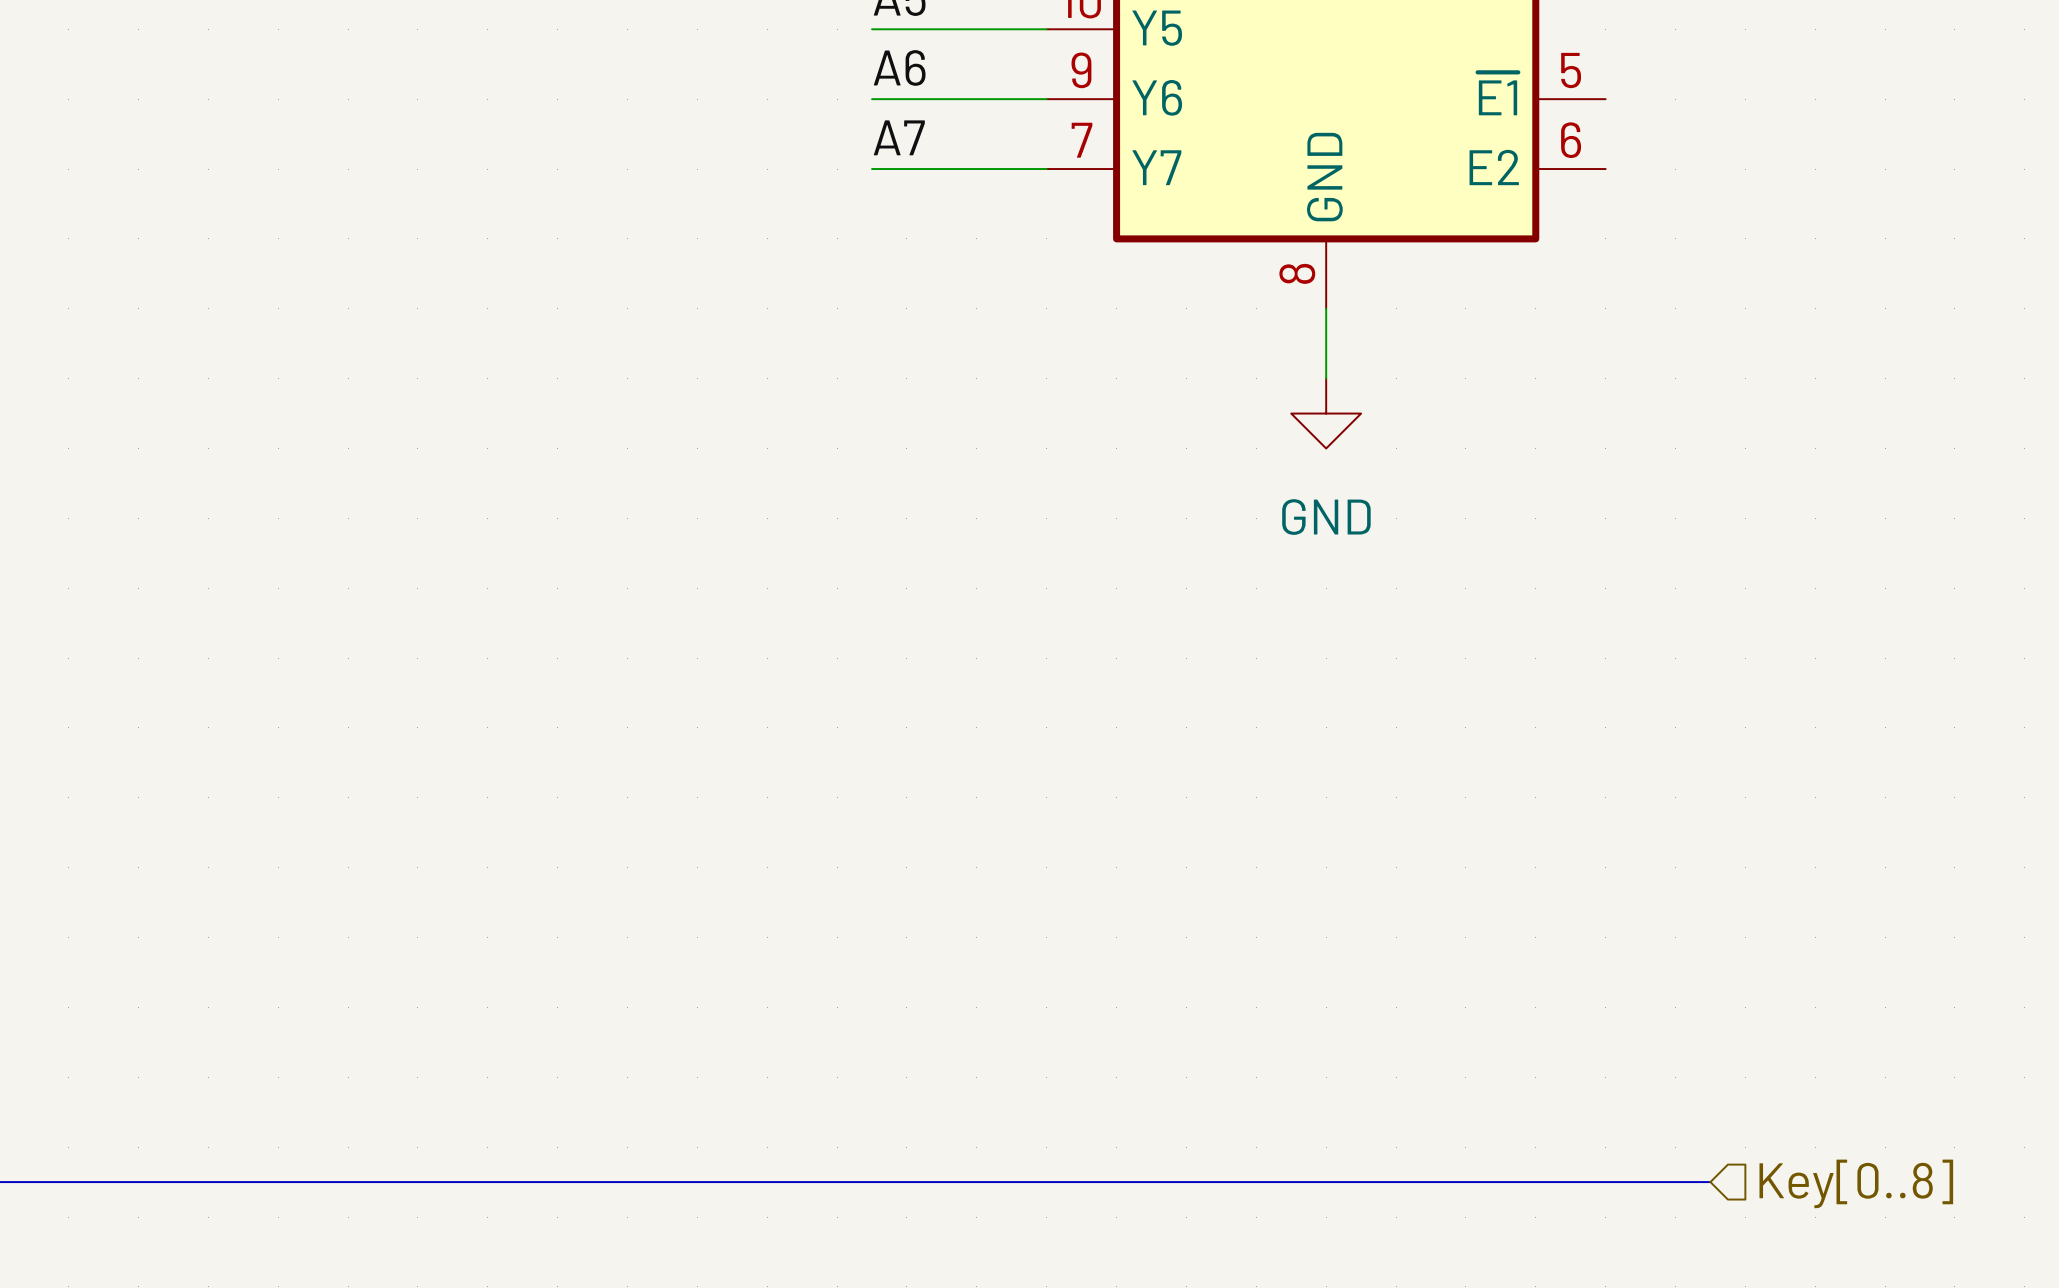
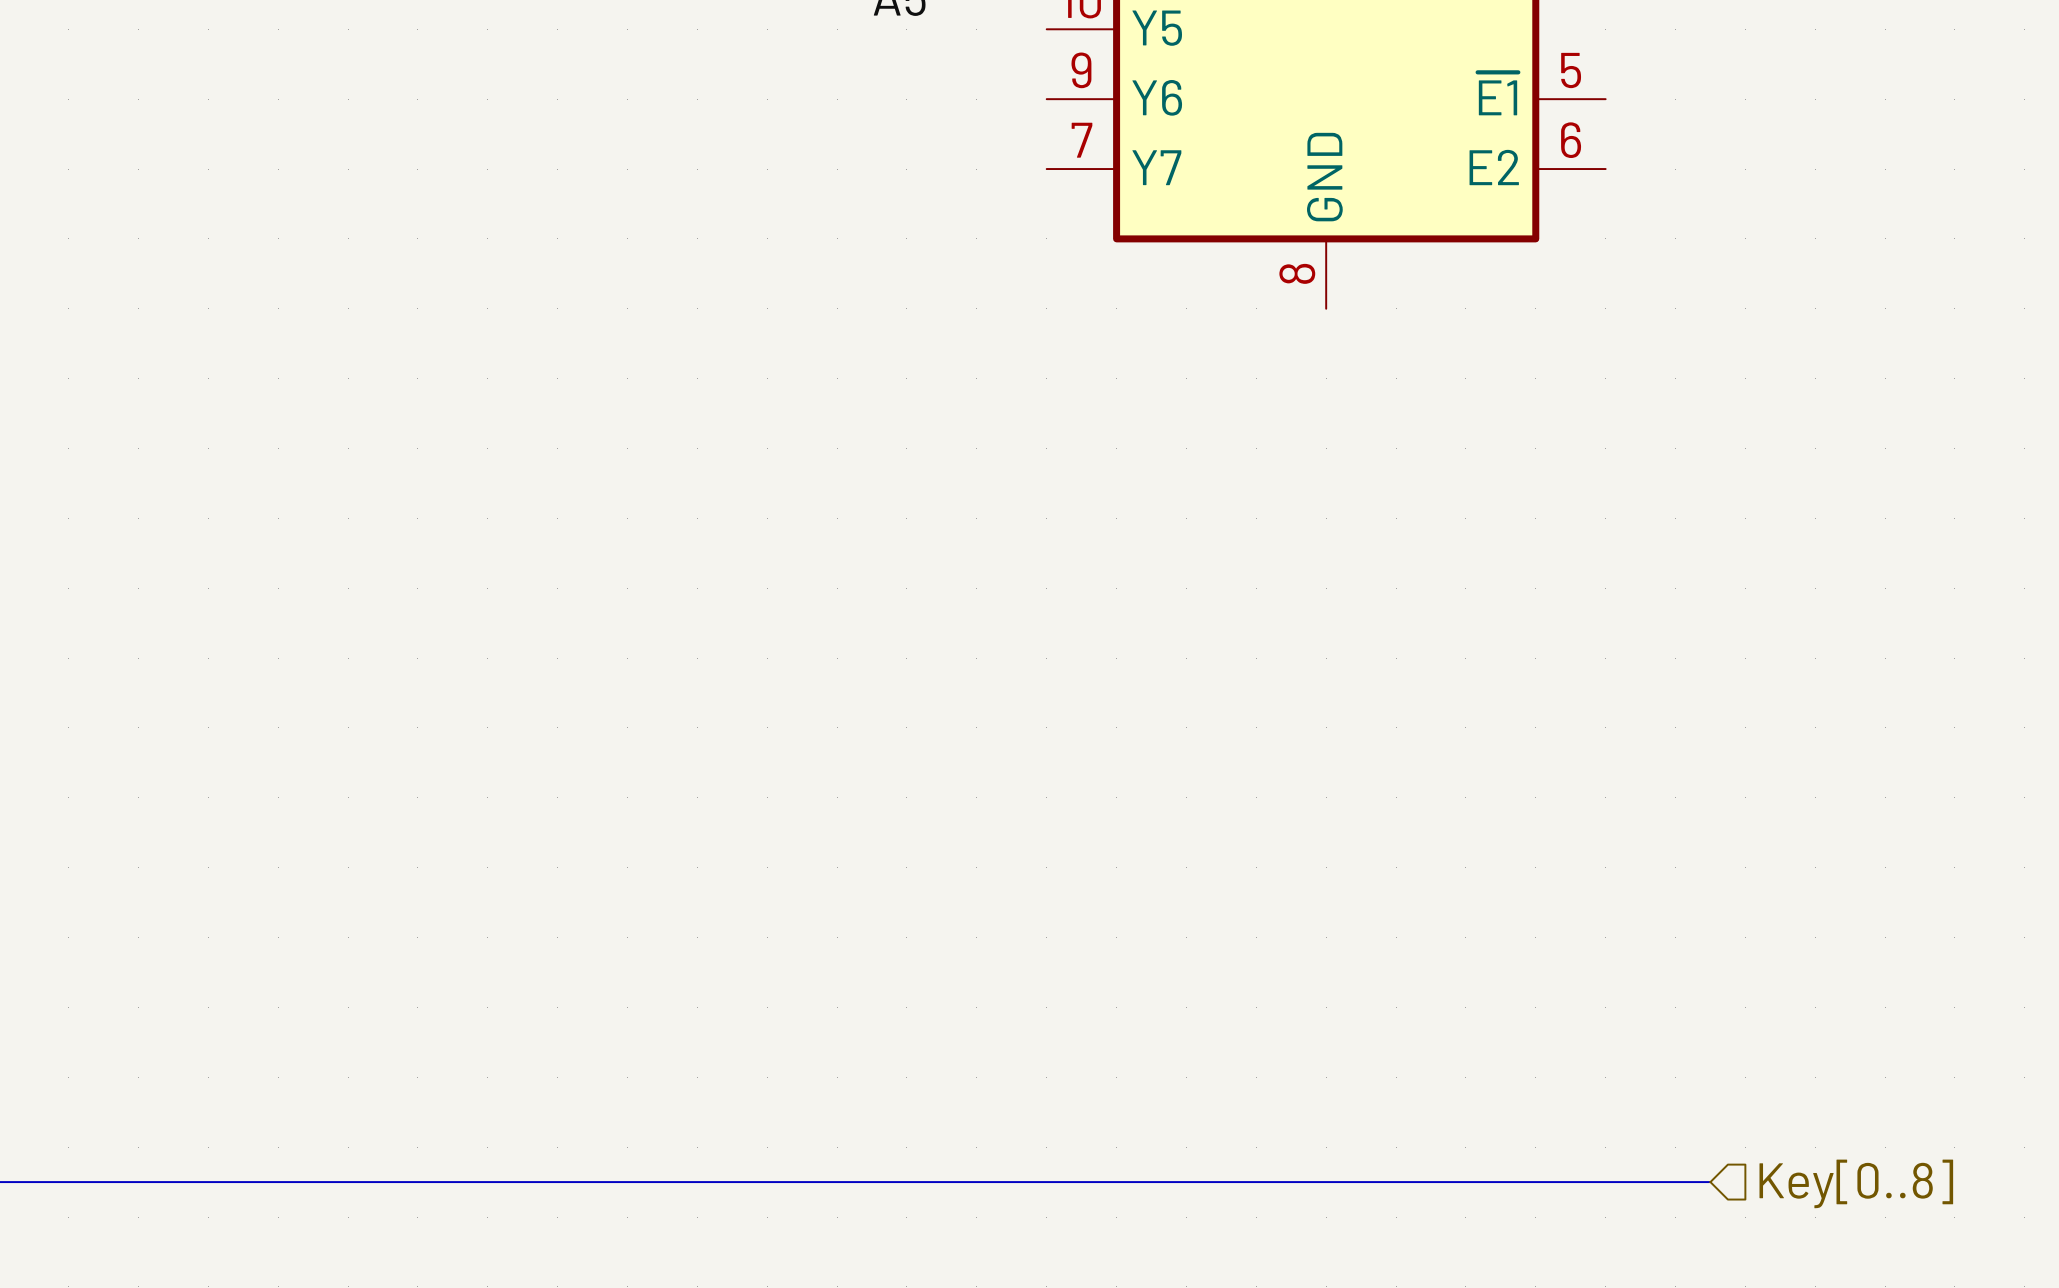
wire: (872, 29) (1046, 29) -> none
label: A6 (899, 67) -> none
wire: (872, 99) (1046, 99) -> none
label: A7 (899, 137) -> none
wire: (872, 169) (1046, 169) -> none
wire: (1326, 308) (1326, 378) -> none
power symbol: GND (1326, 413) -> none

